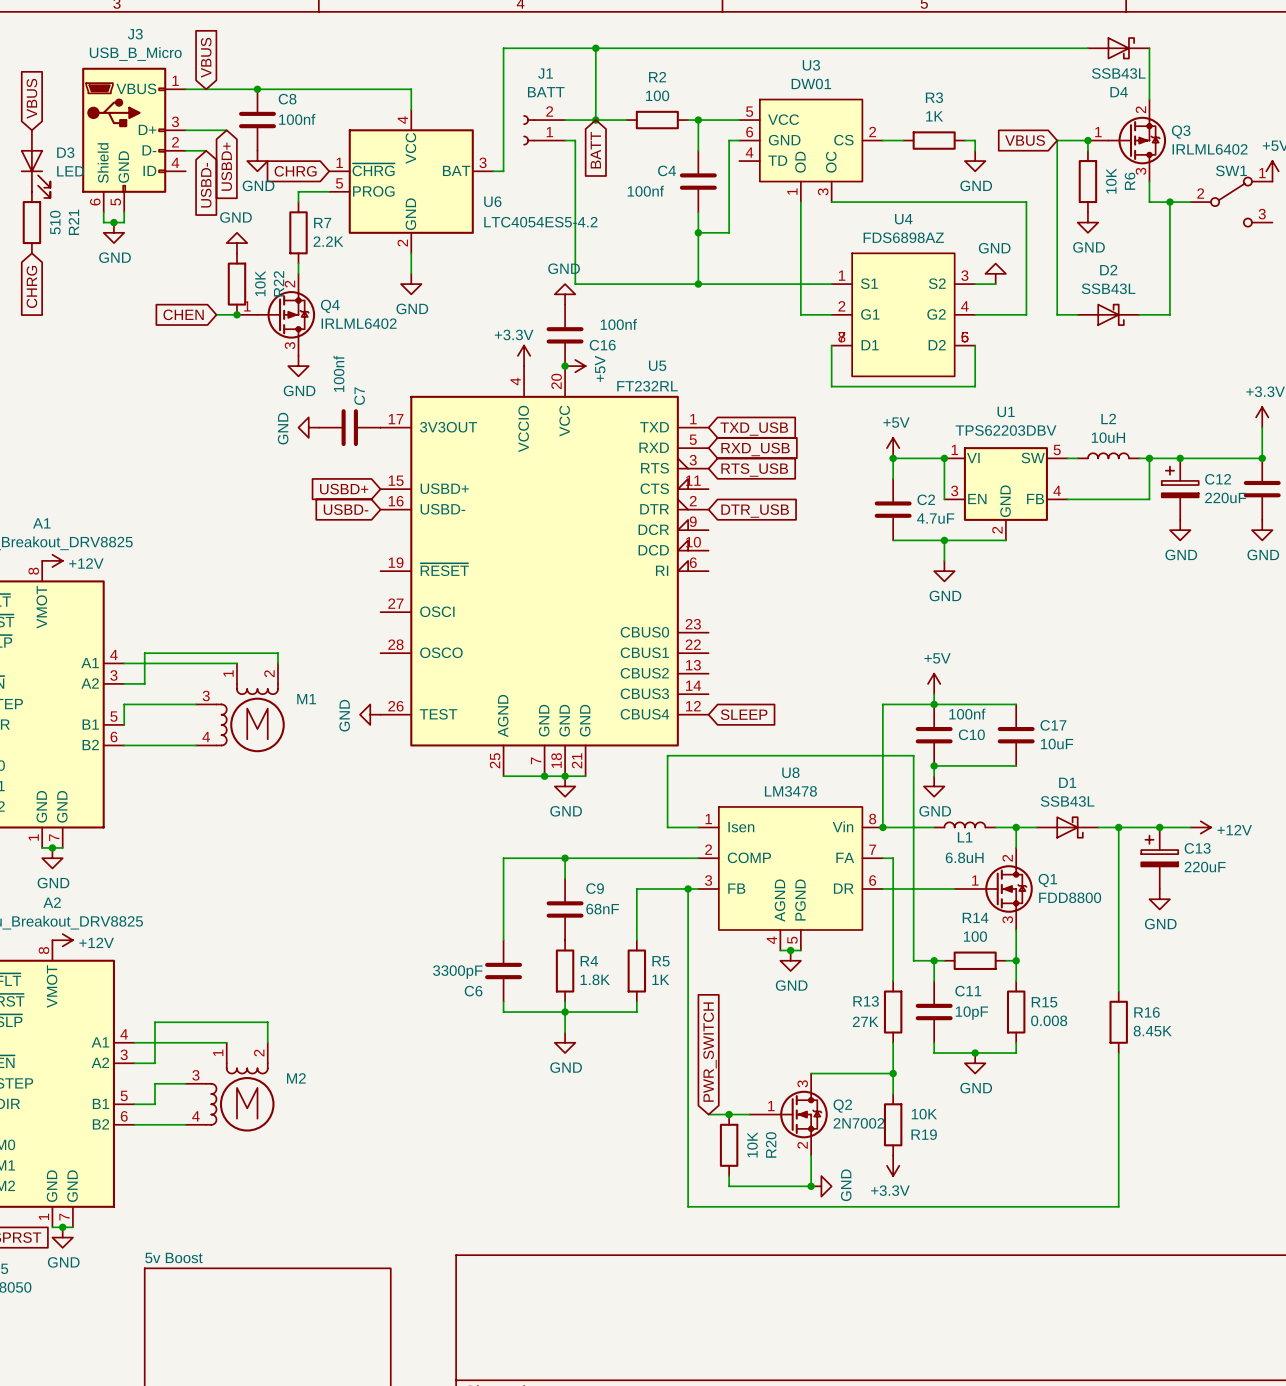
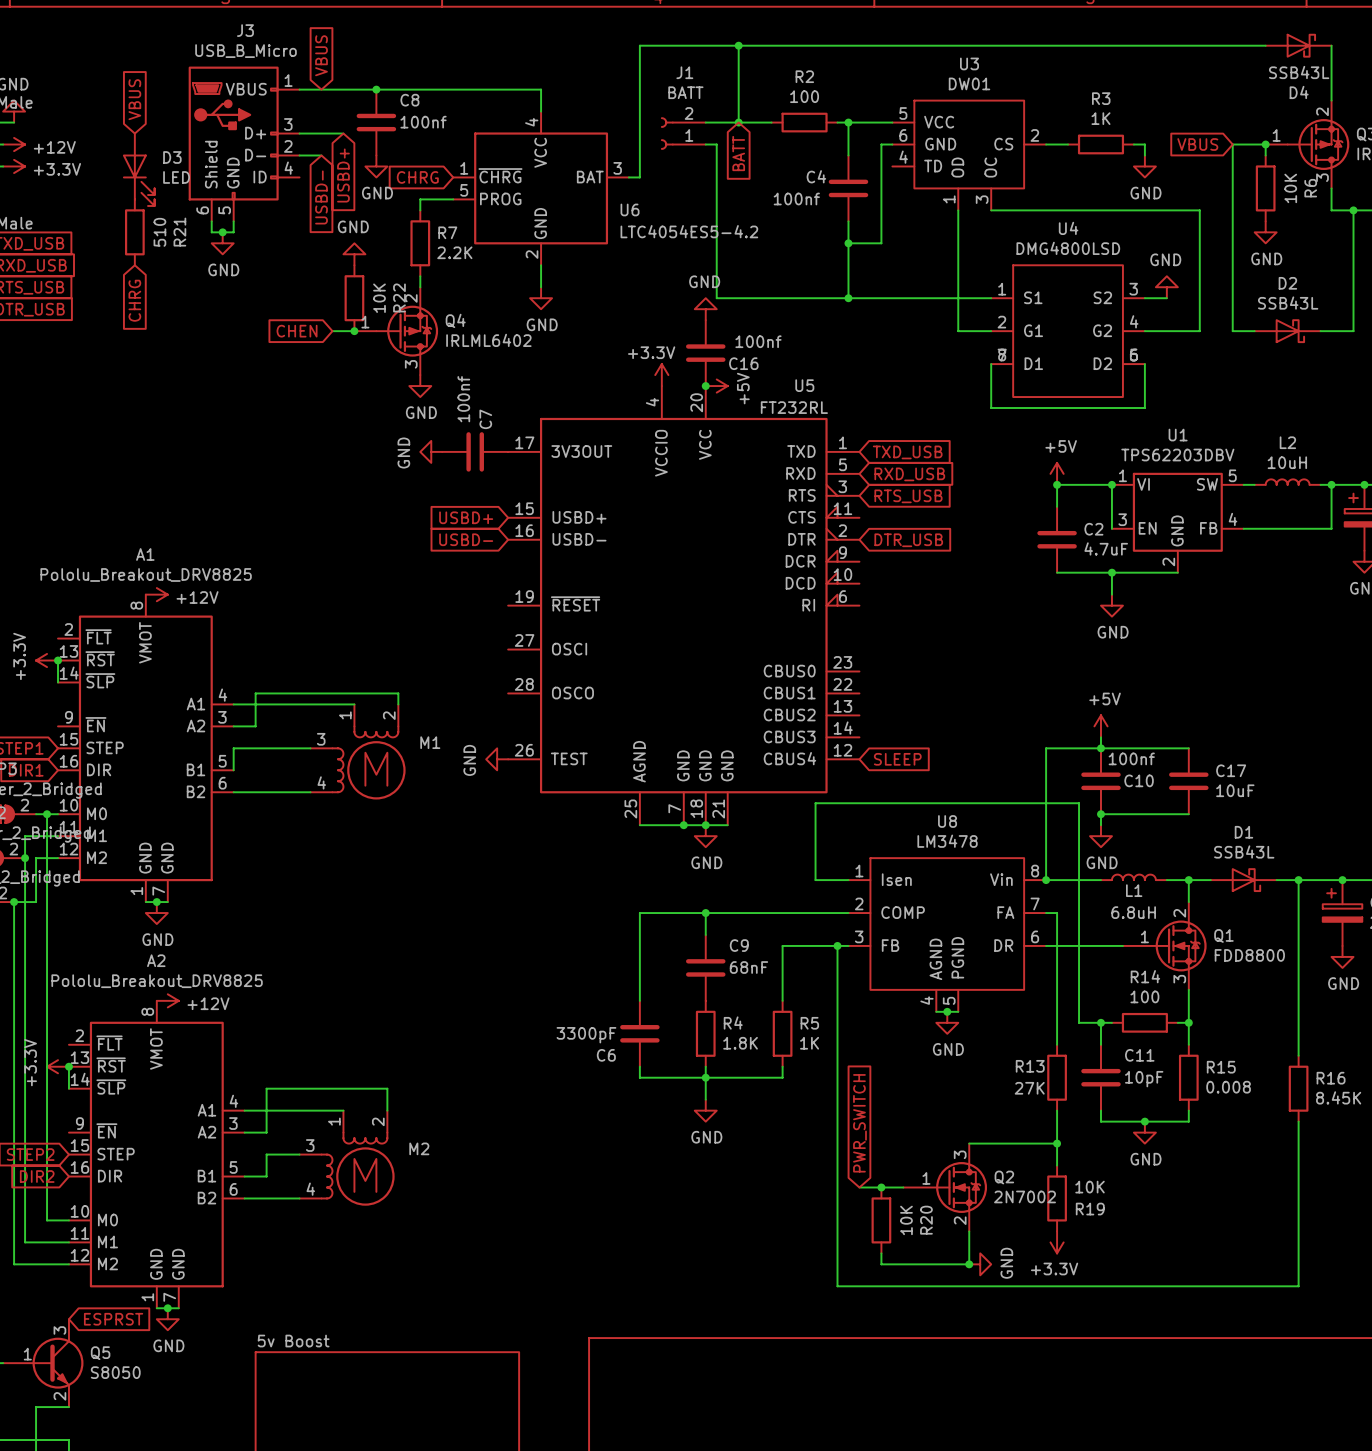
U4 value: FDS6898AZ (903, 237) -> DMG4800LSD (1068, 248)

